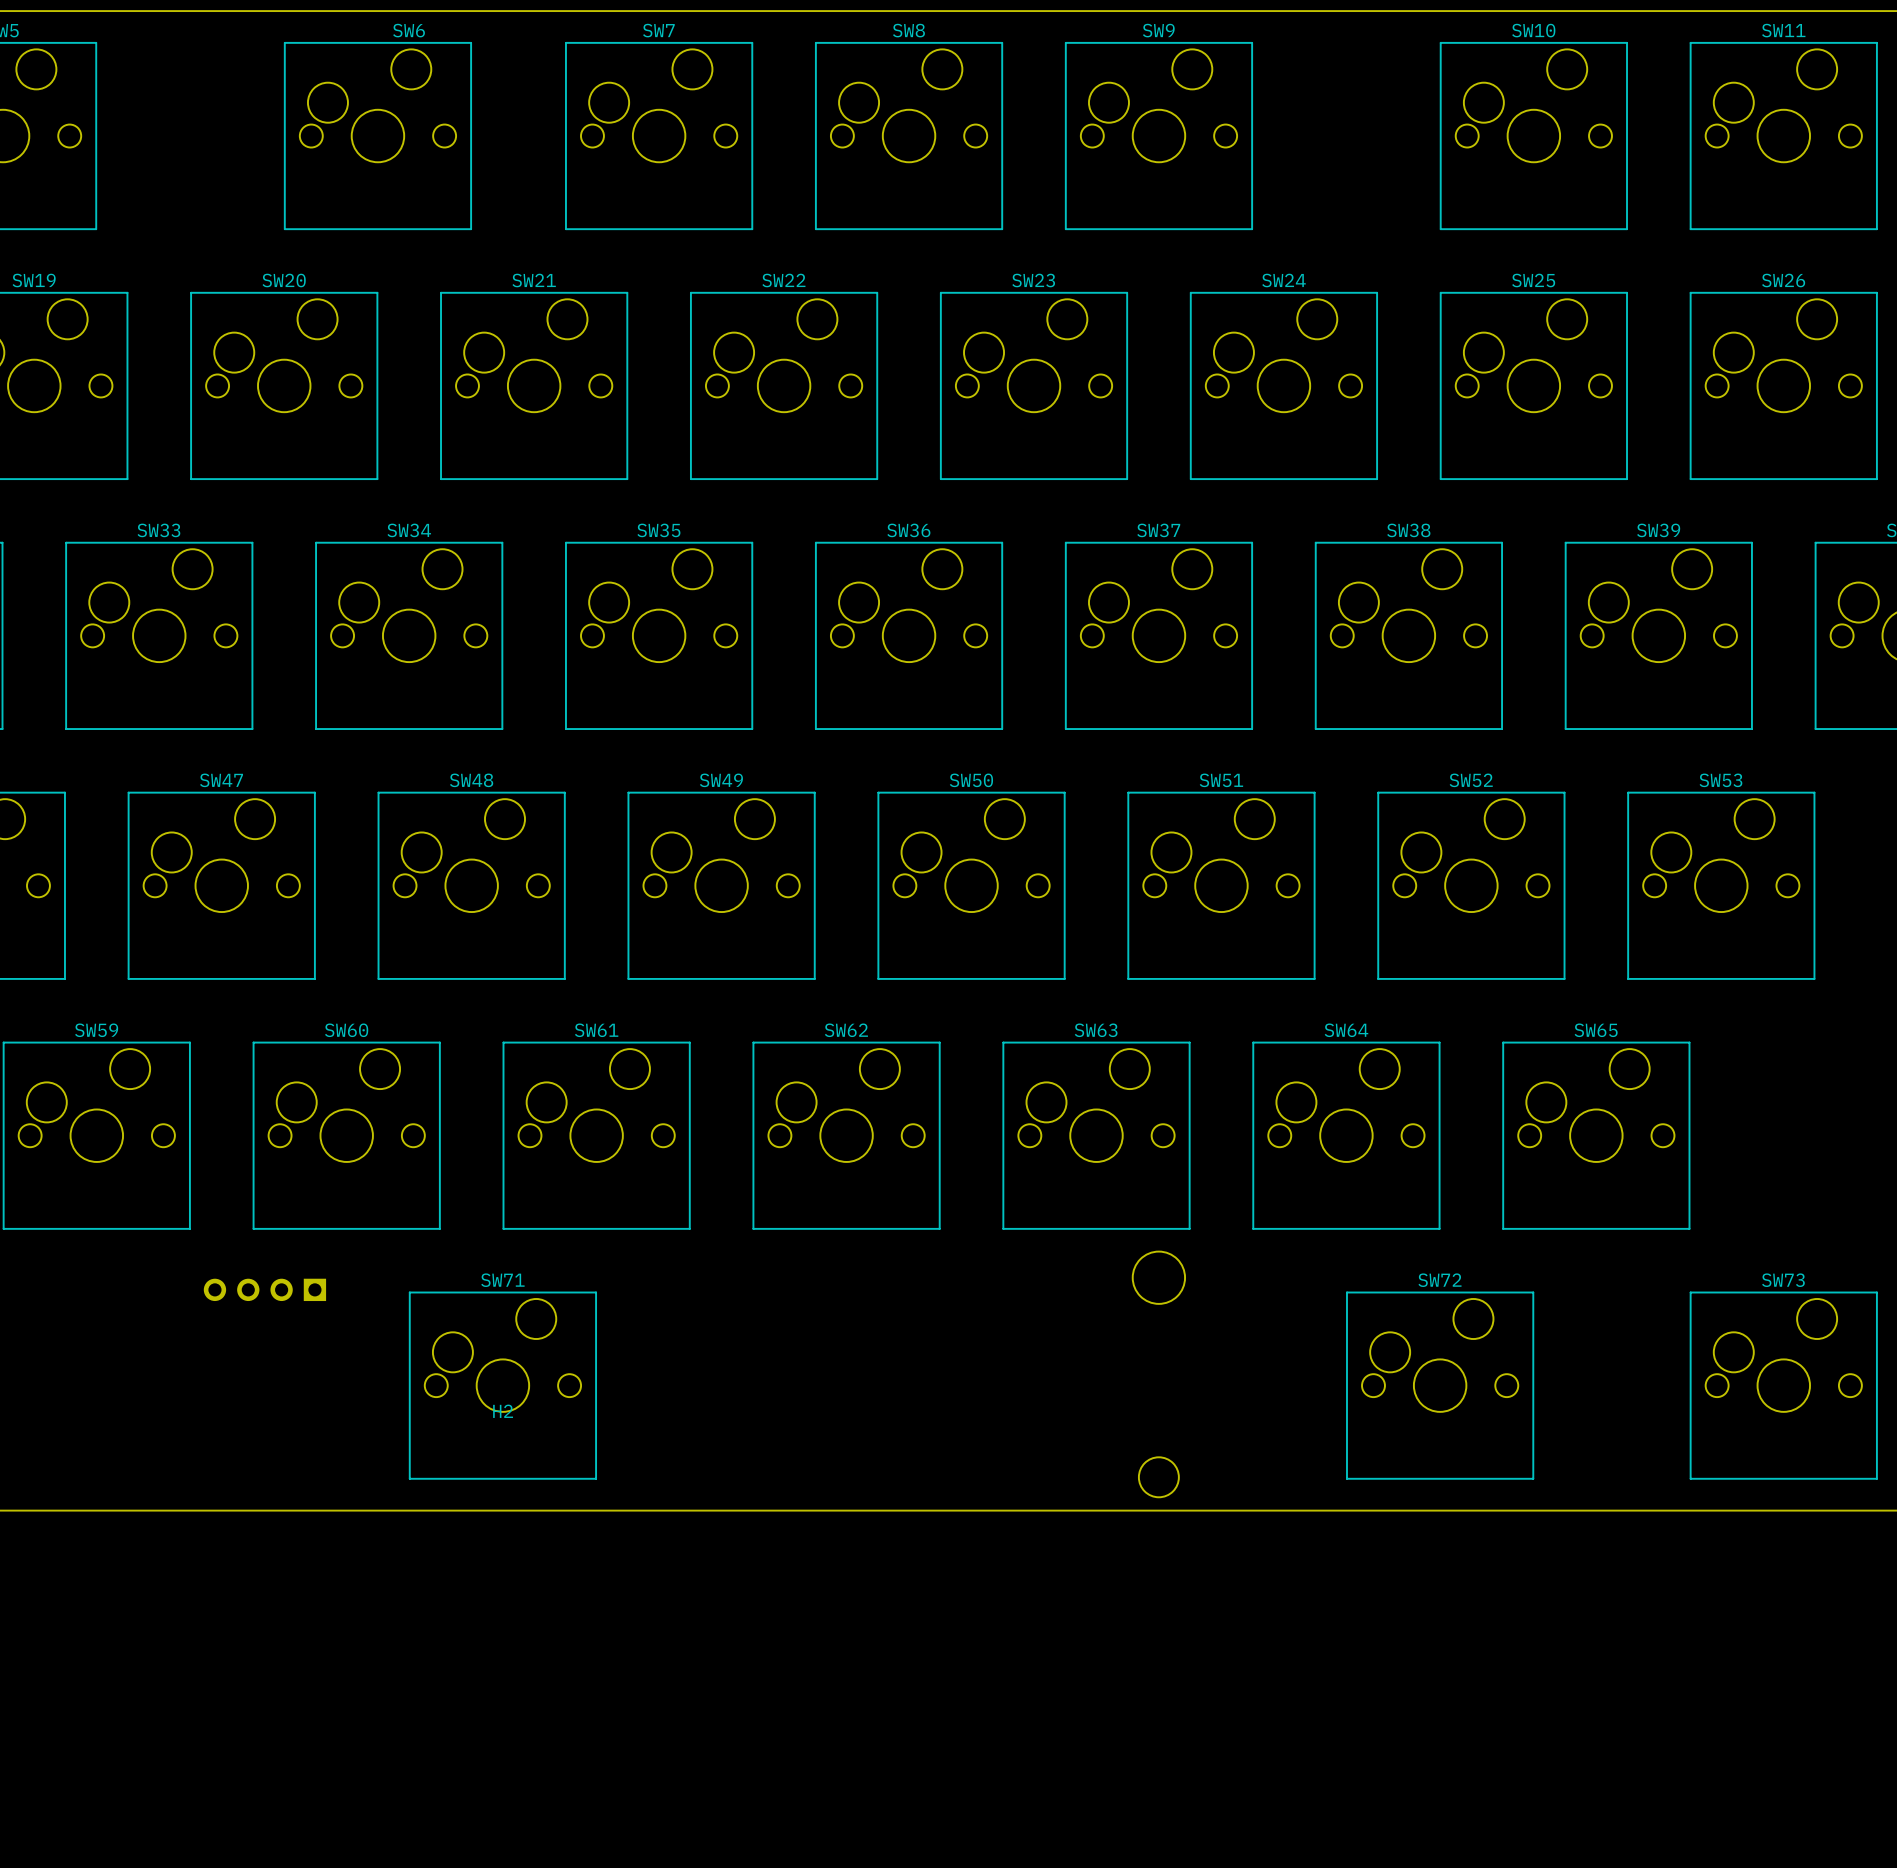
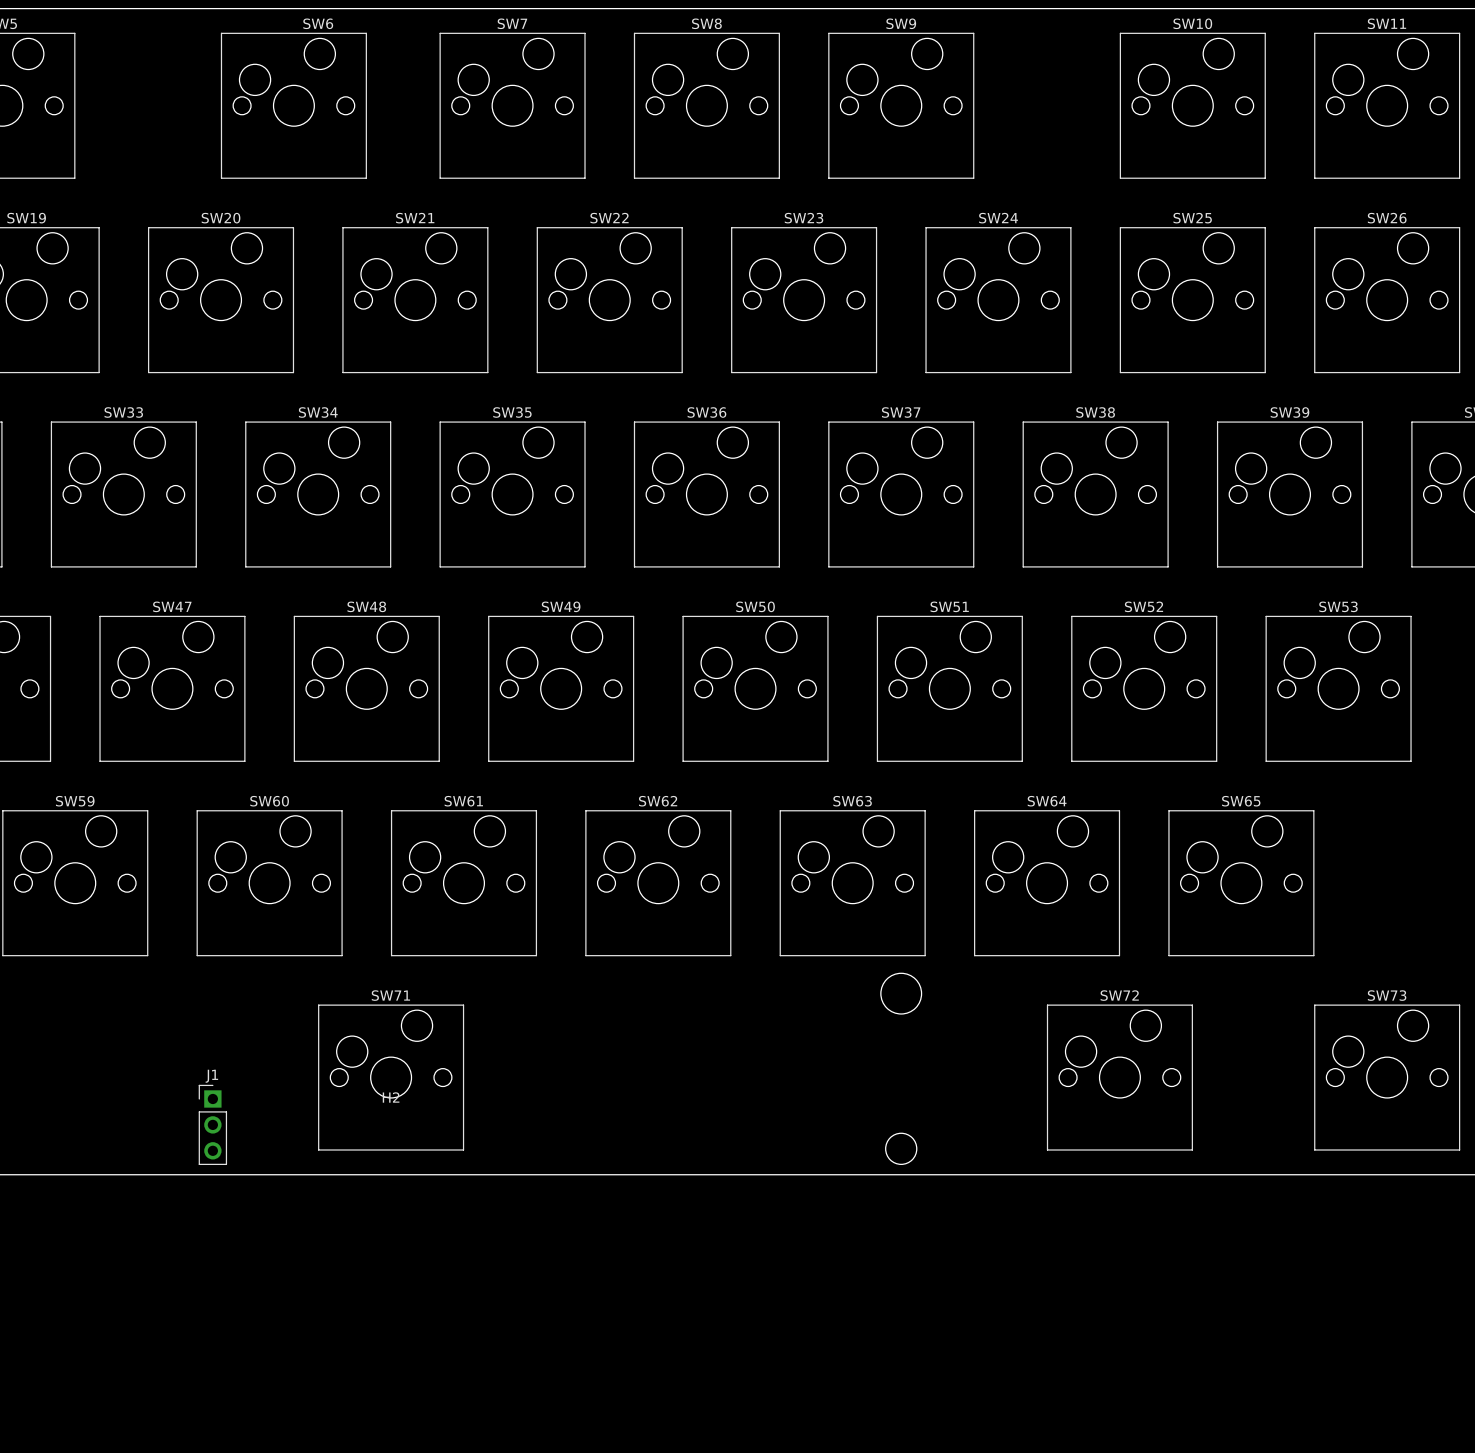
part: (264, 1289) -> none
J1: none -> (212, 1124)

